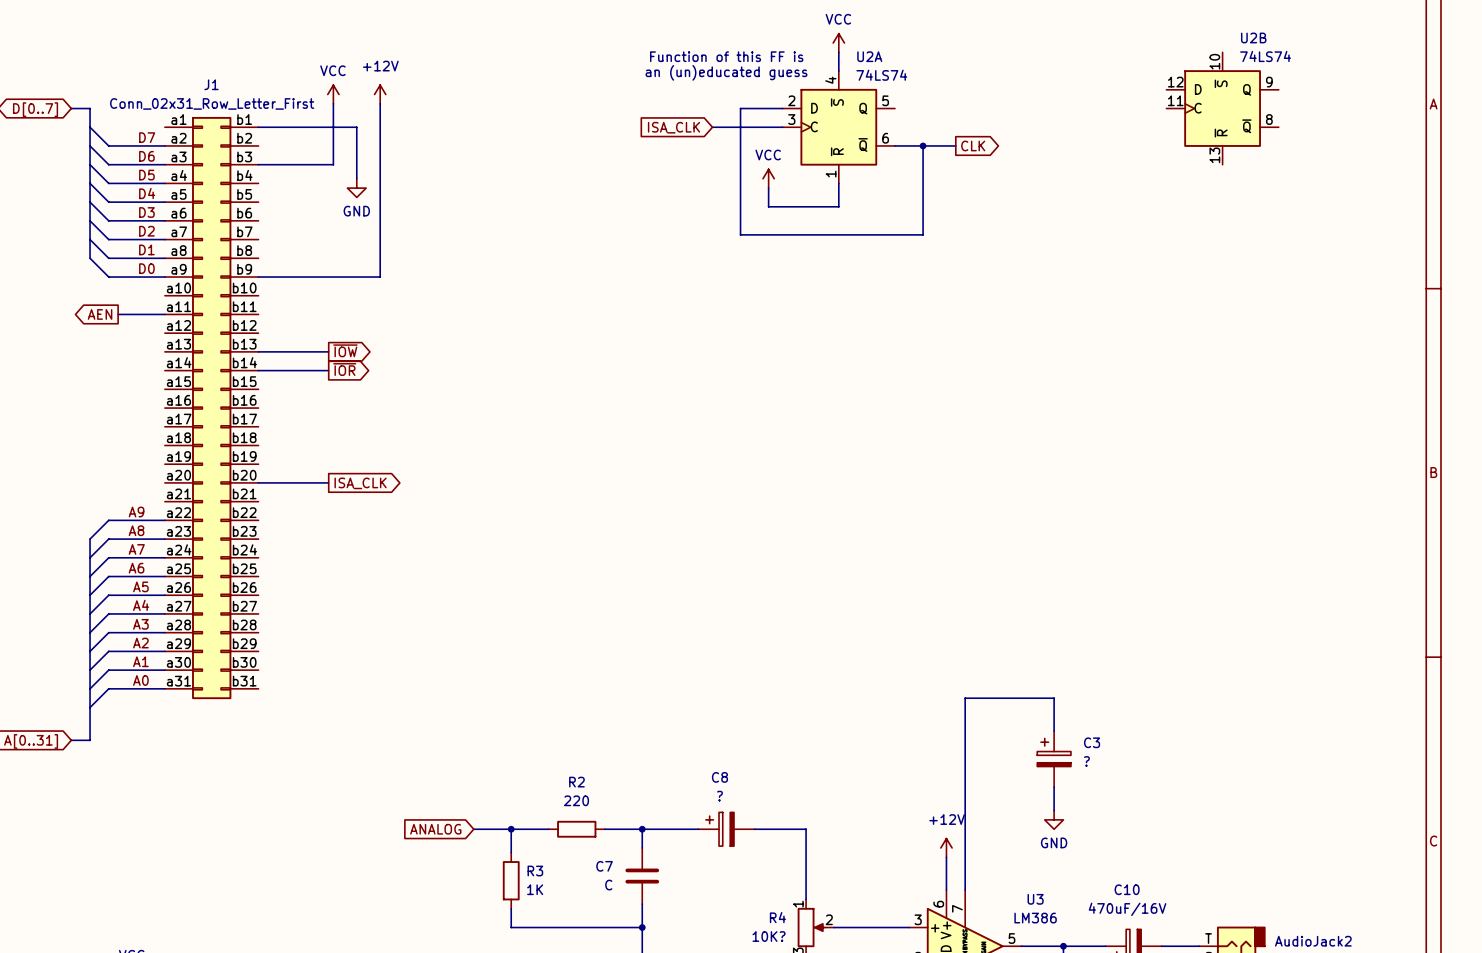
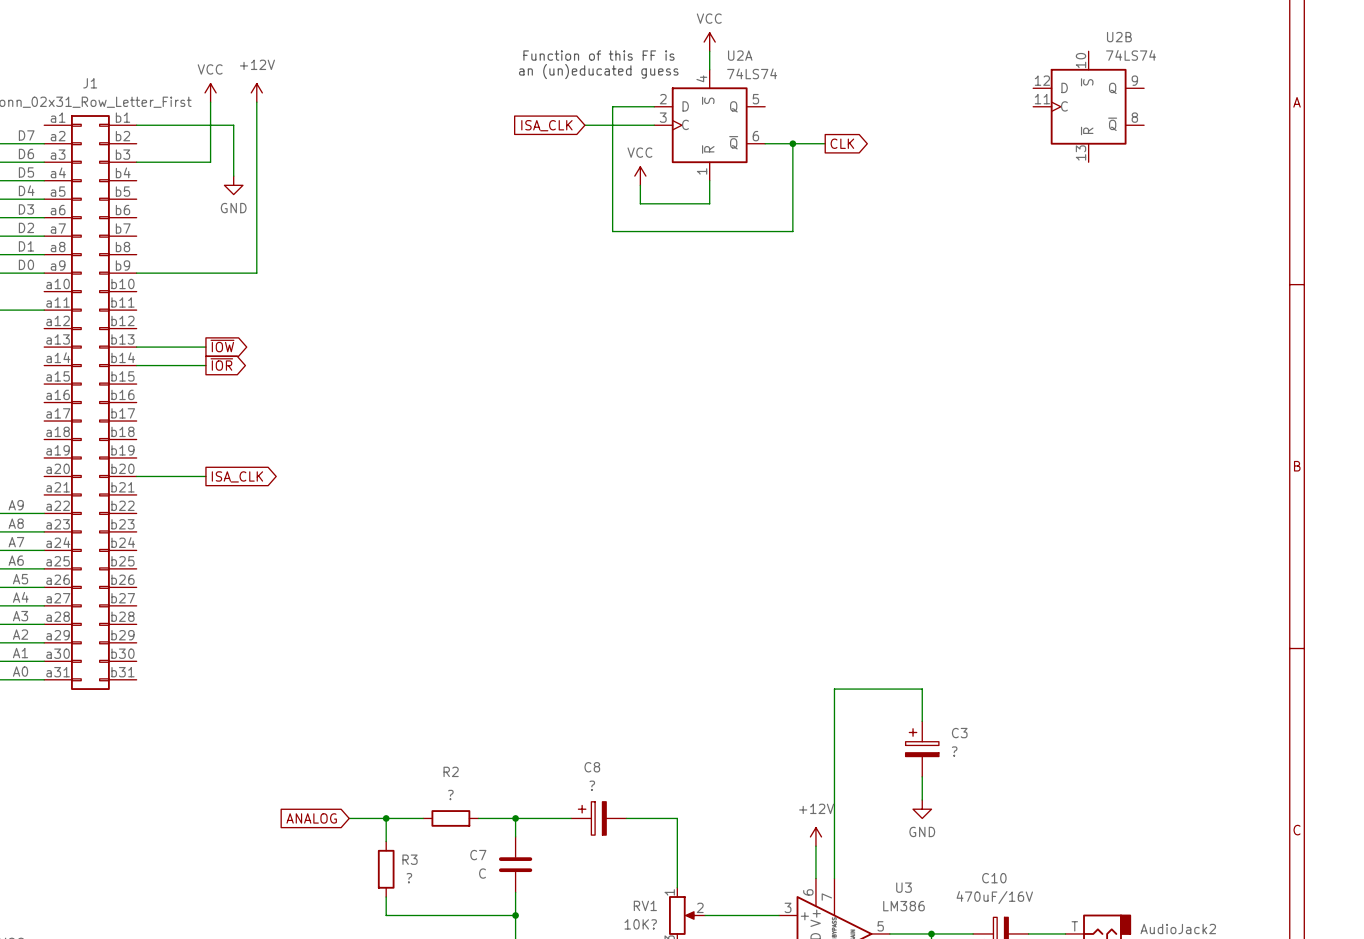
R2 value: 220 (576, 800) -> ? (450, 794)
R3 value: 1K (535, 889) -> ? (409, 878)
R4 name: R4 (777, 917) -> RV1 (645, 905)

